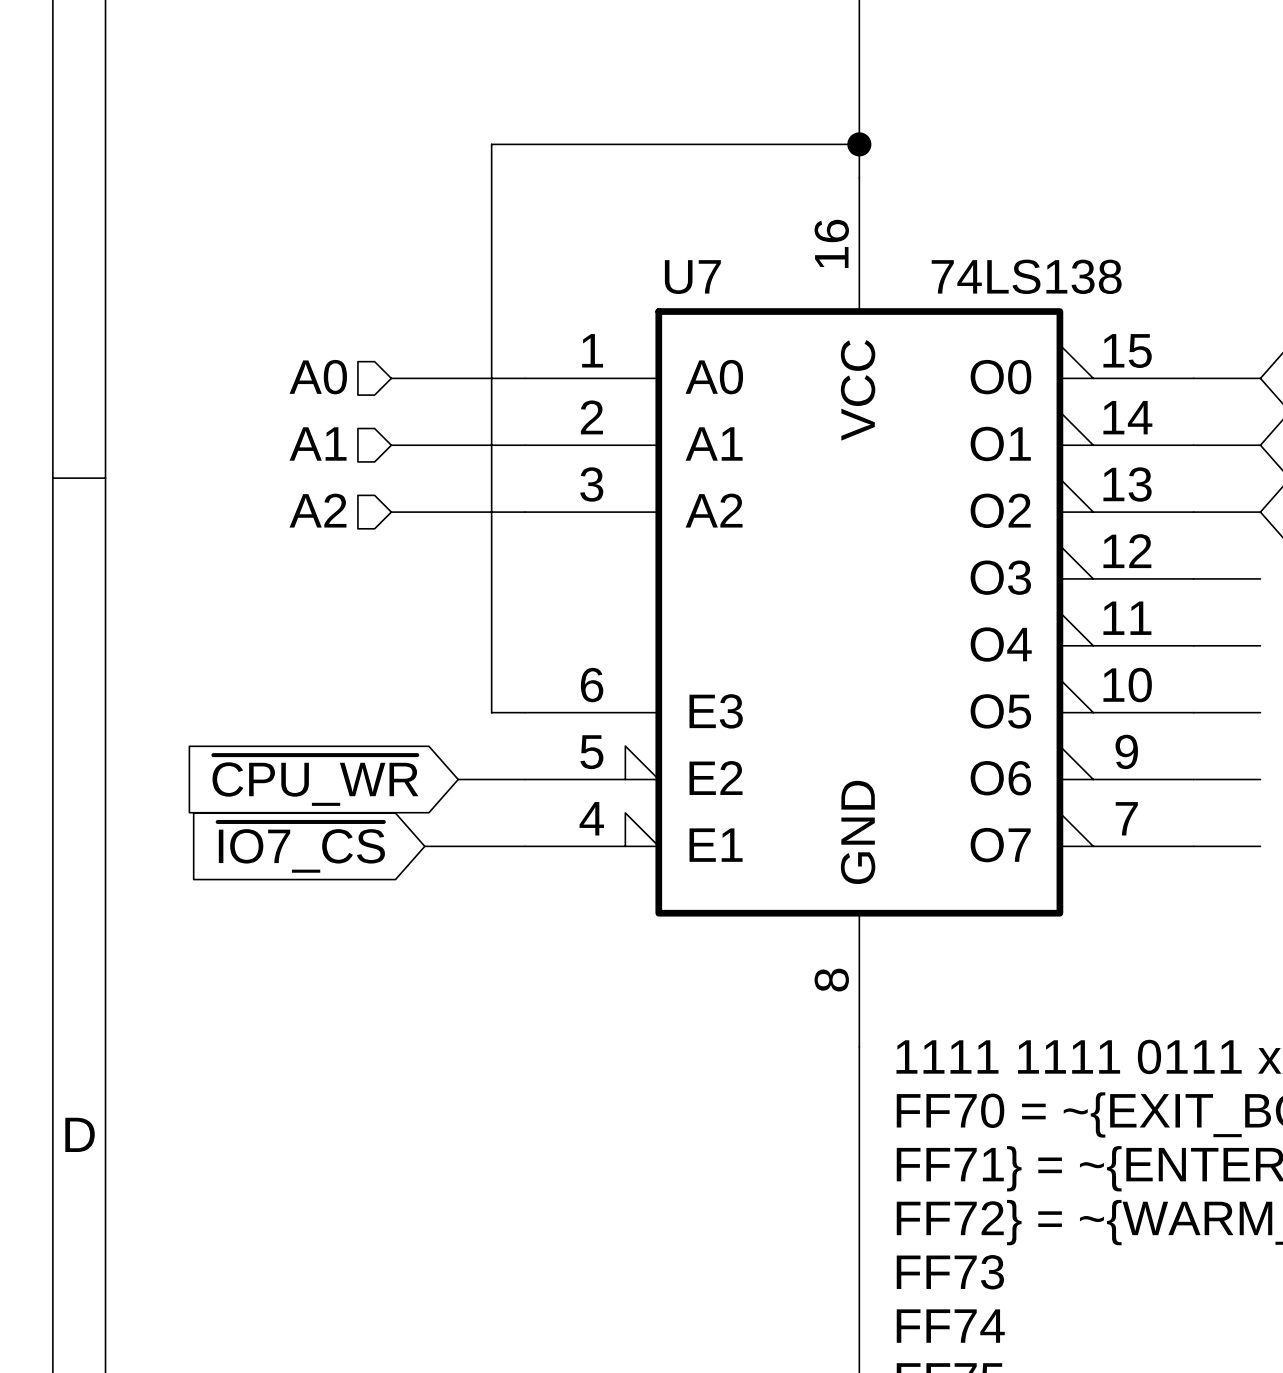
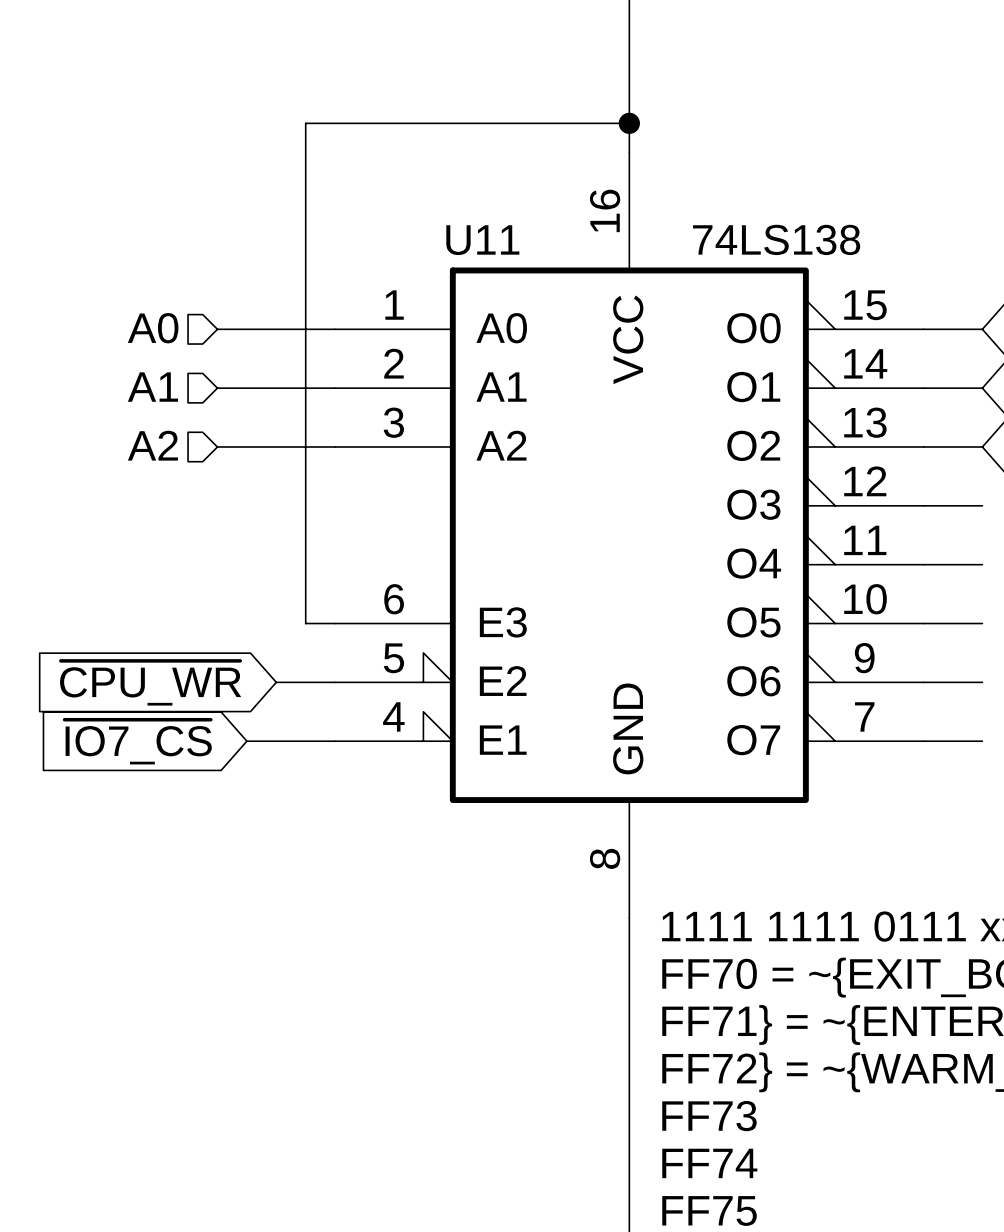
U7 name: U7 (692, 277) -> U11 (482, 240)

